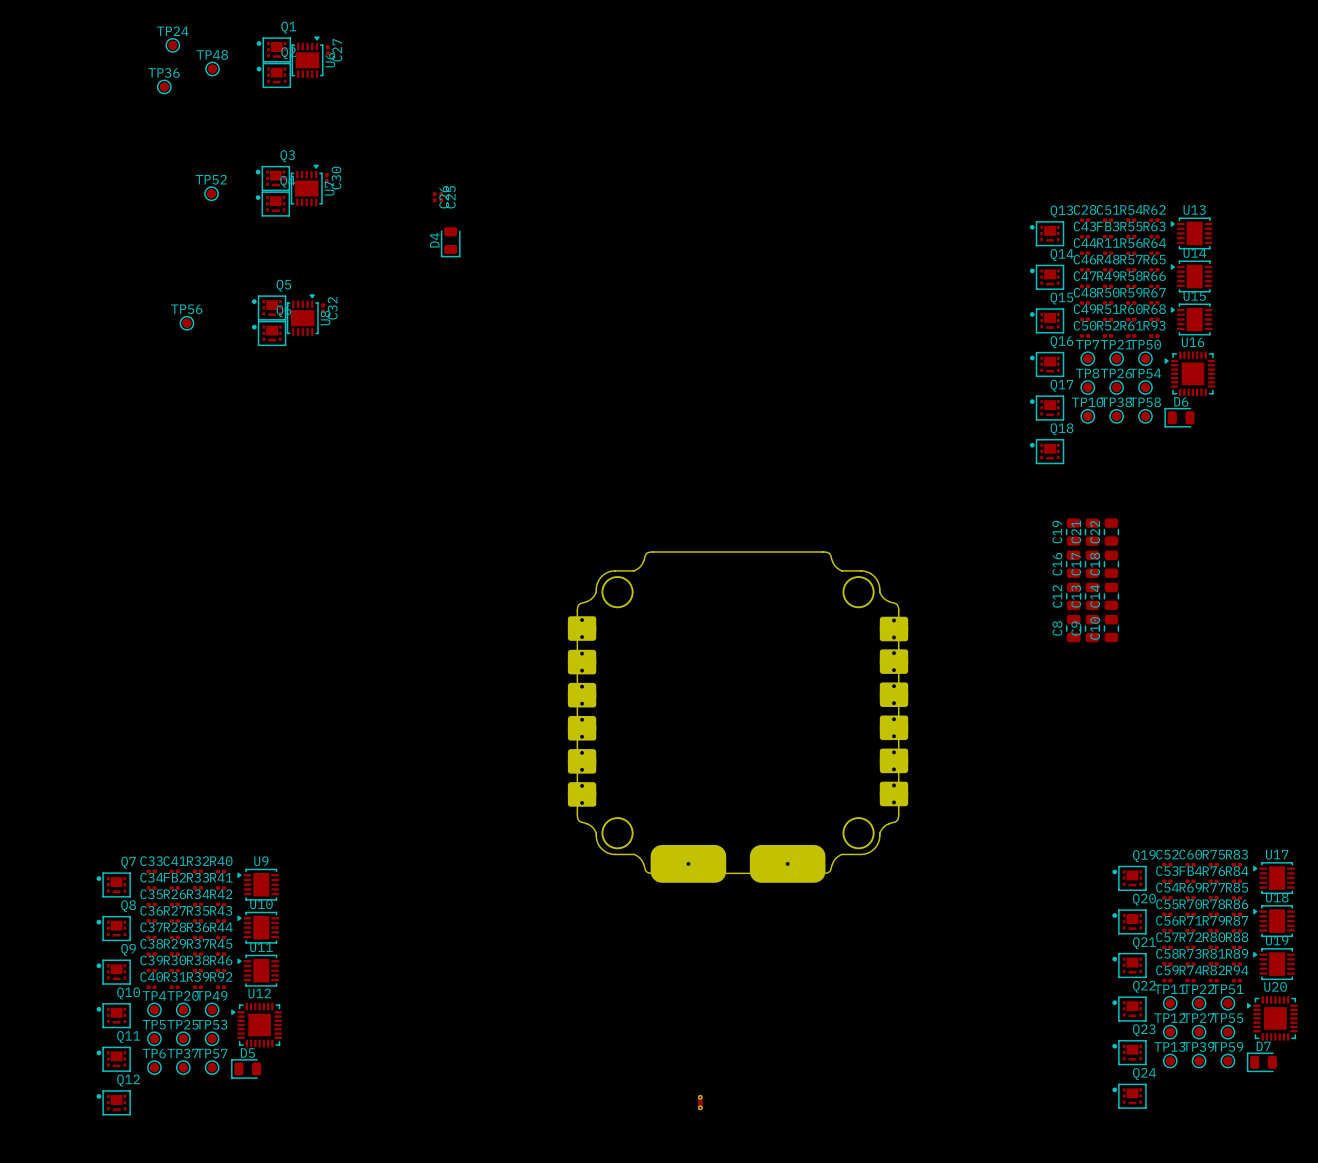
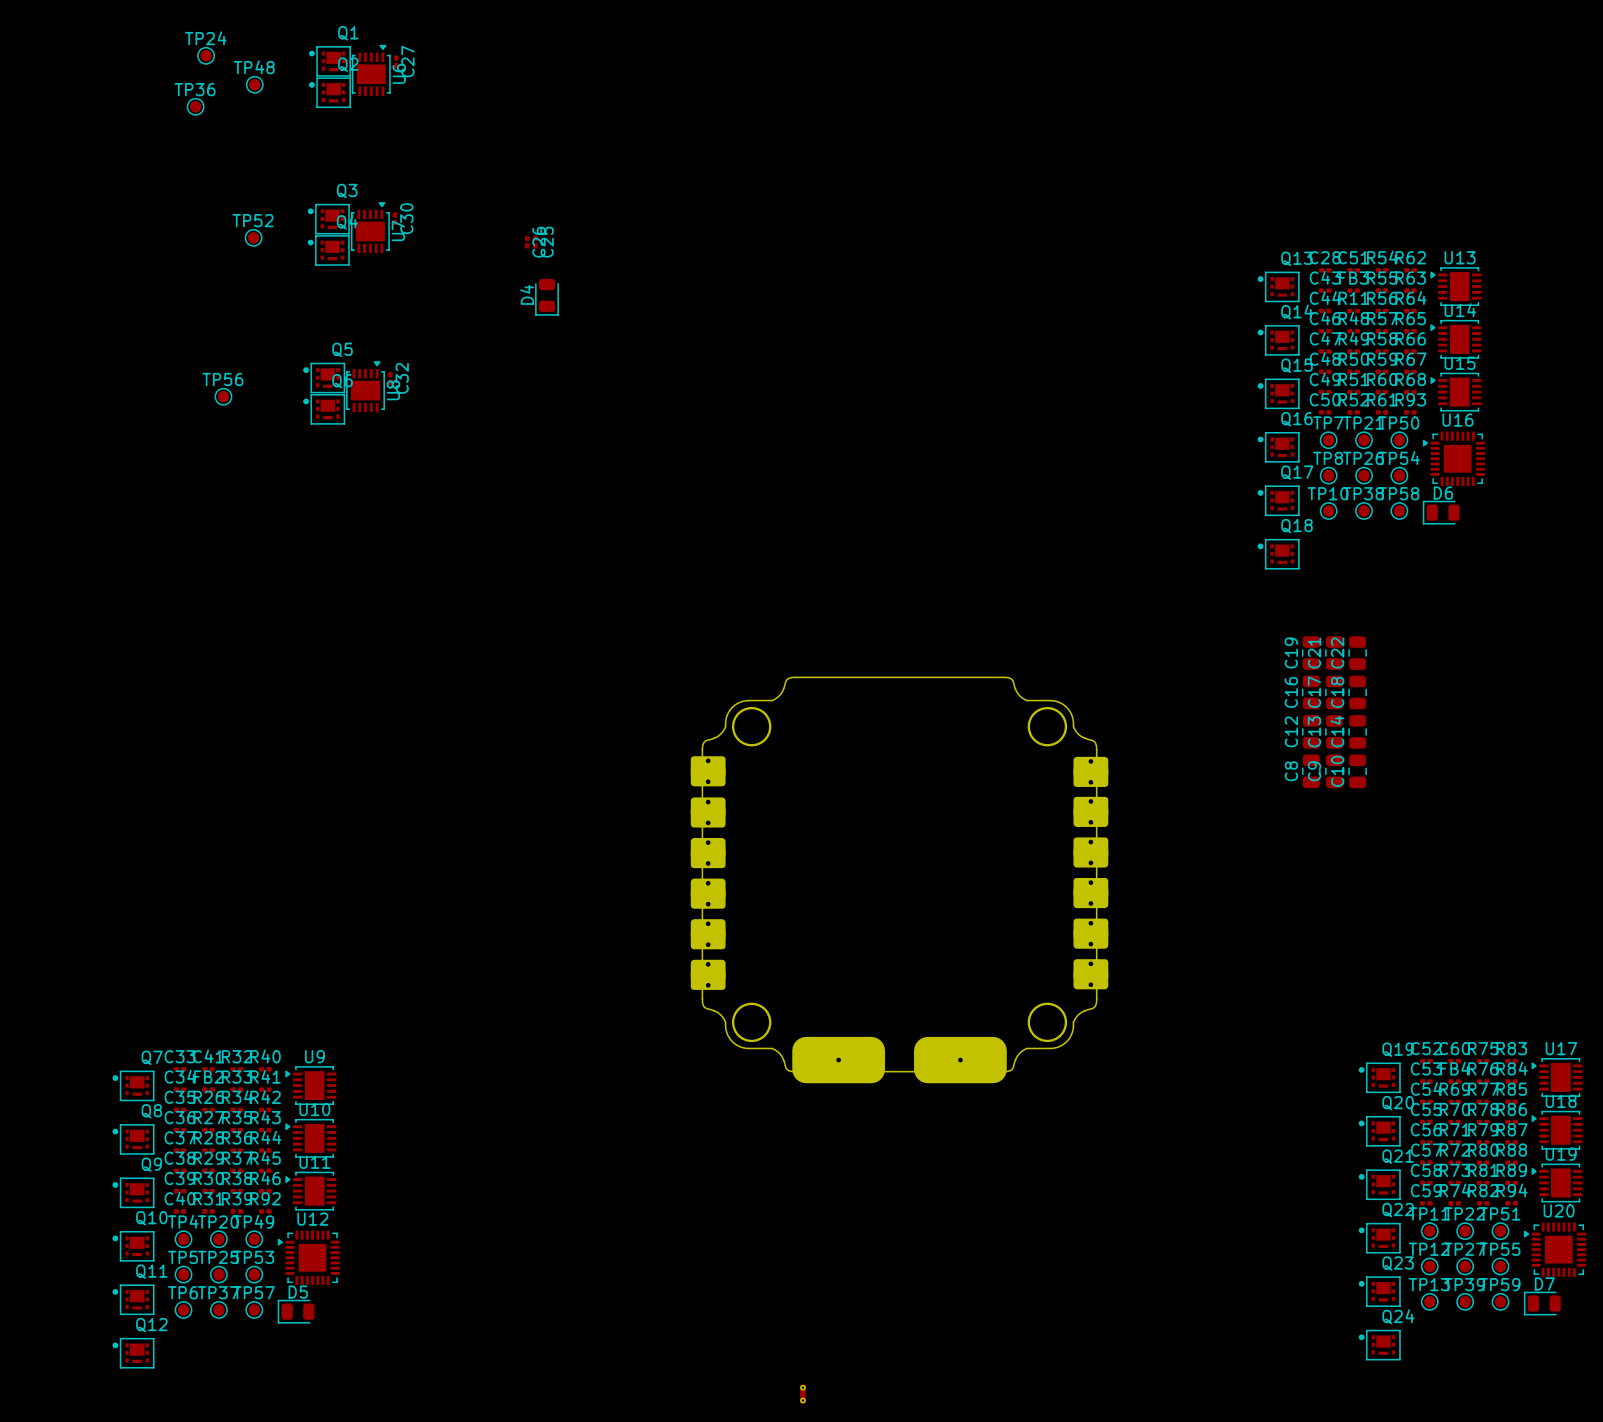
part position: (700, 1102) -> (802, 1394)

